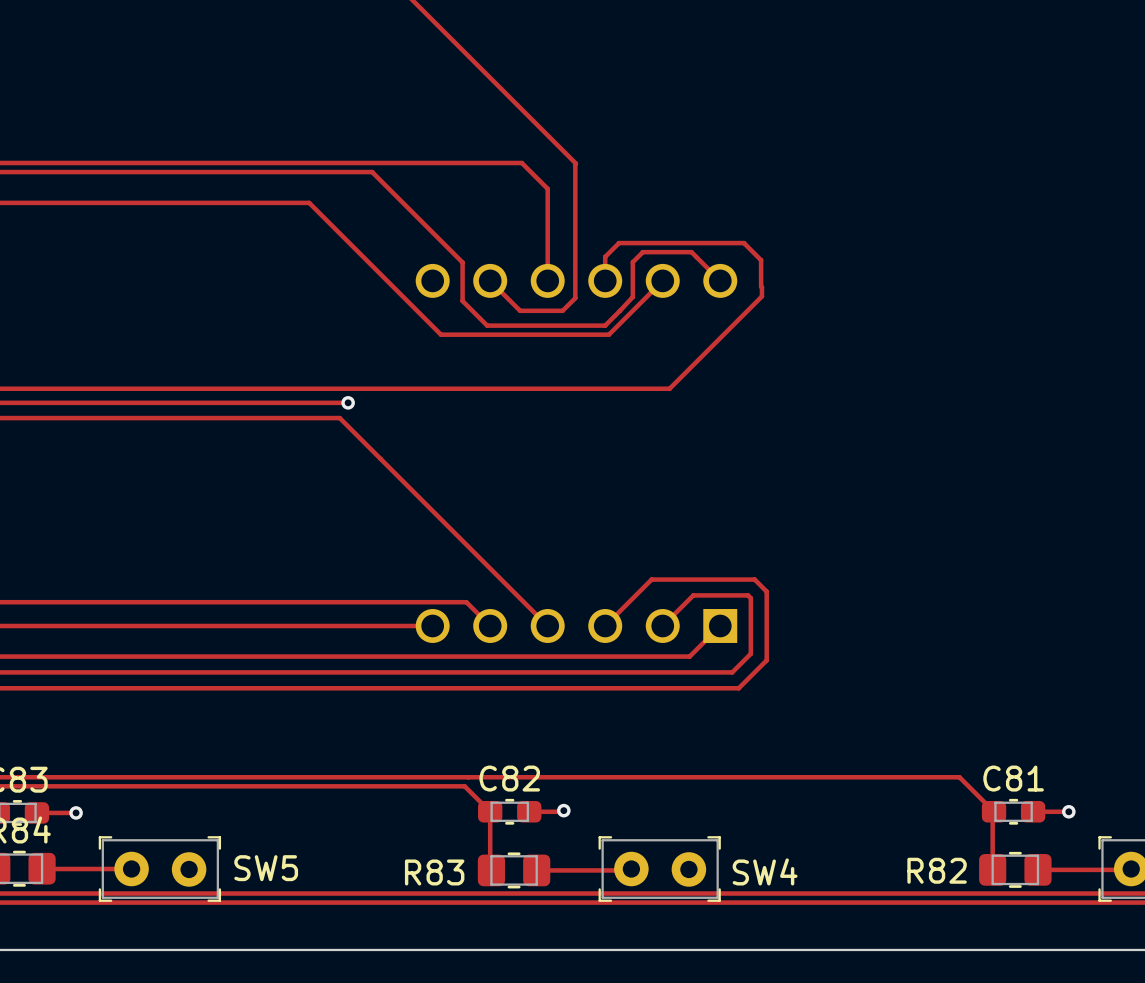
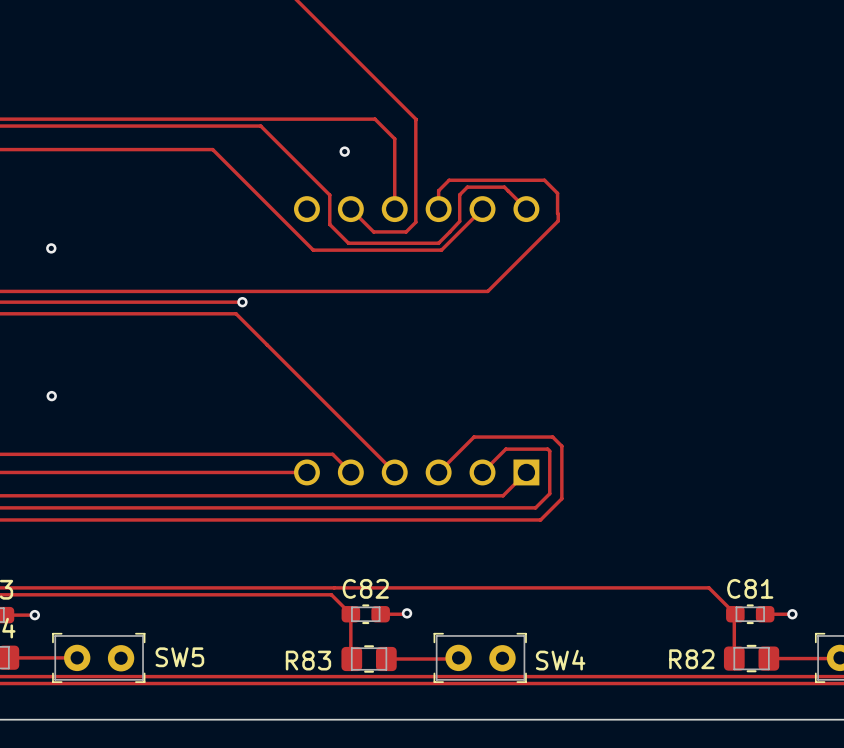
via: none -> (344, 151)
via: none -> (51, 248)
via: none -> (51, 396)

